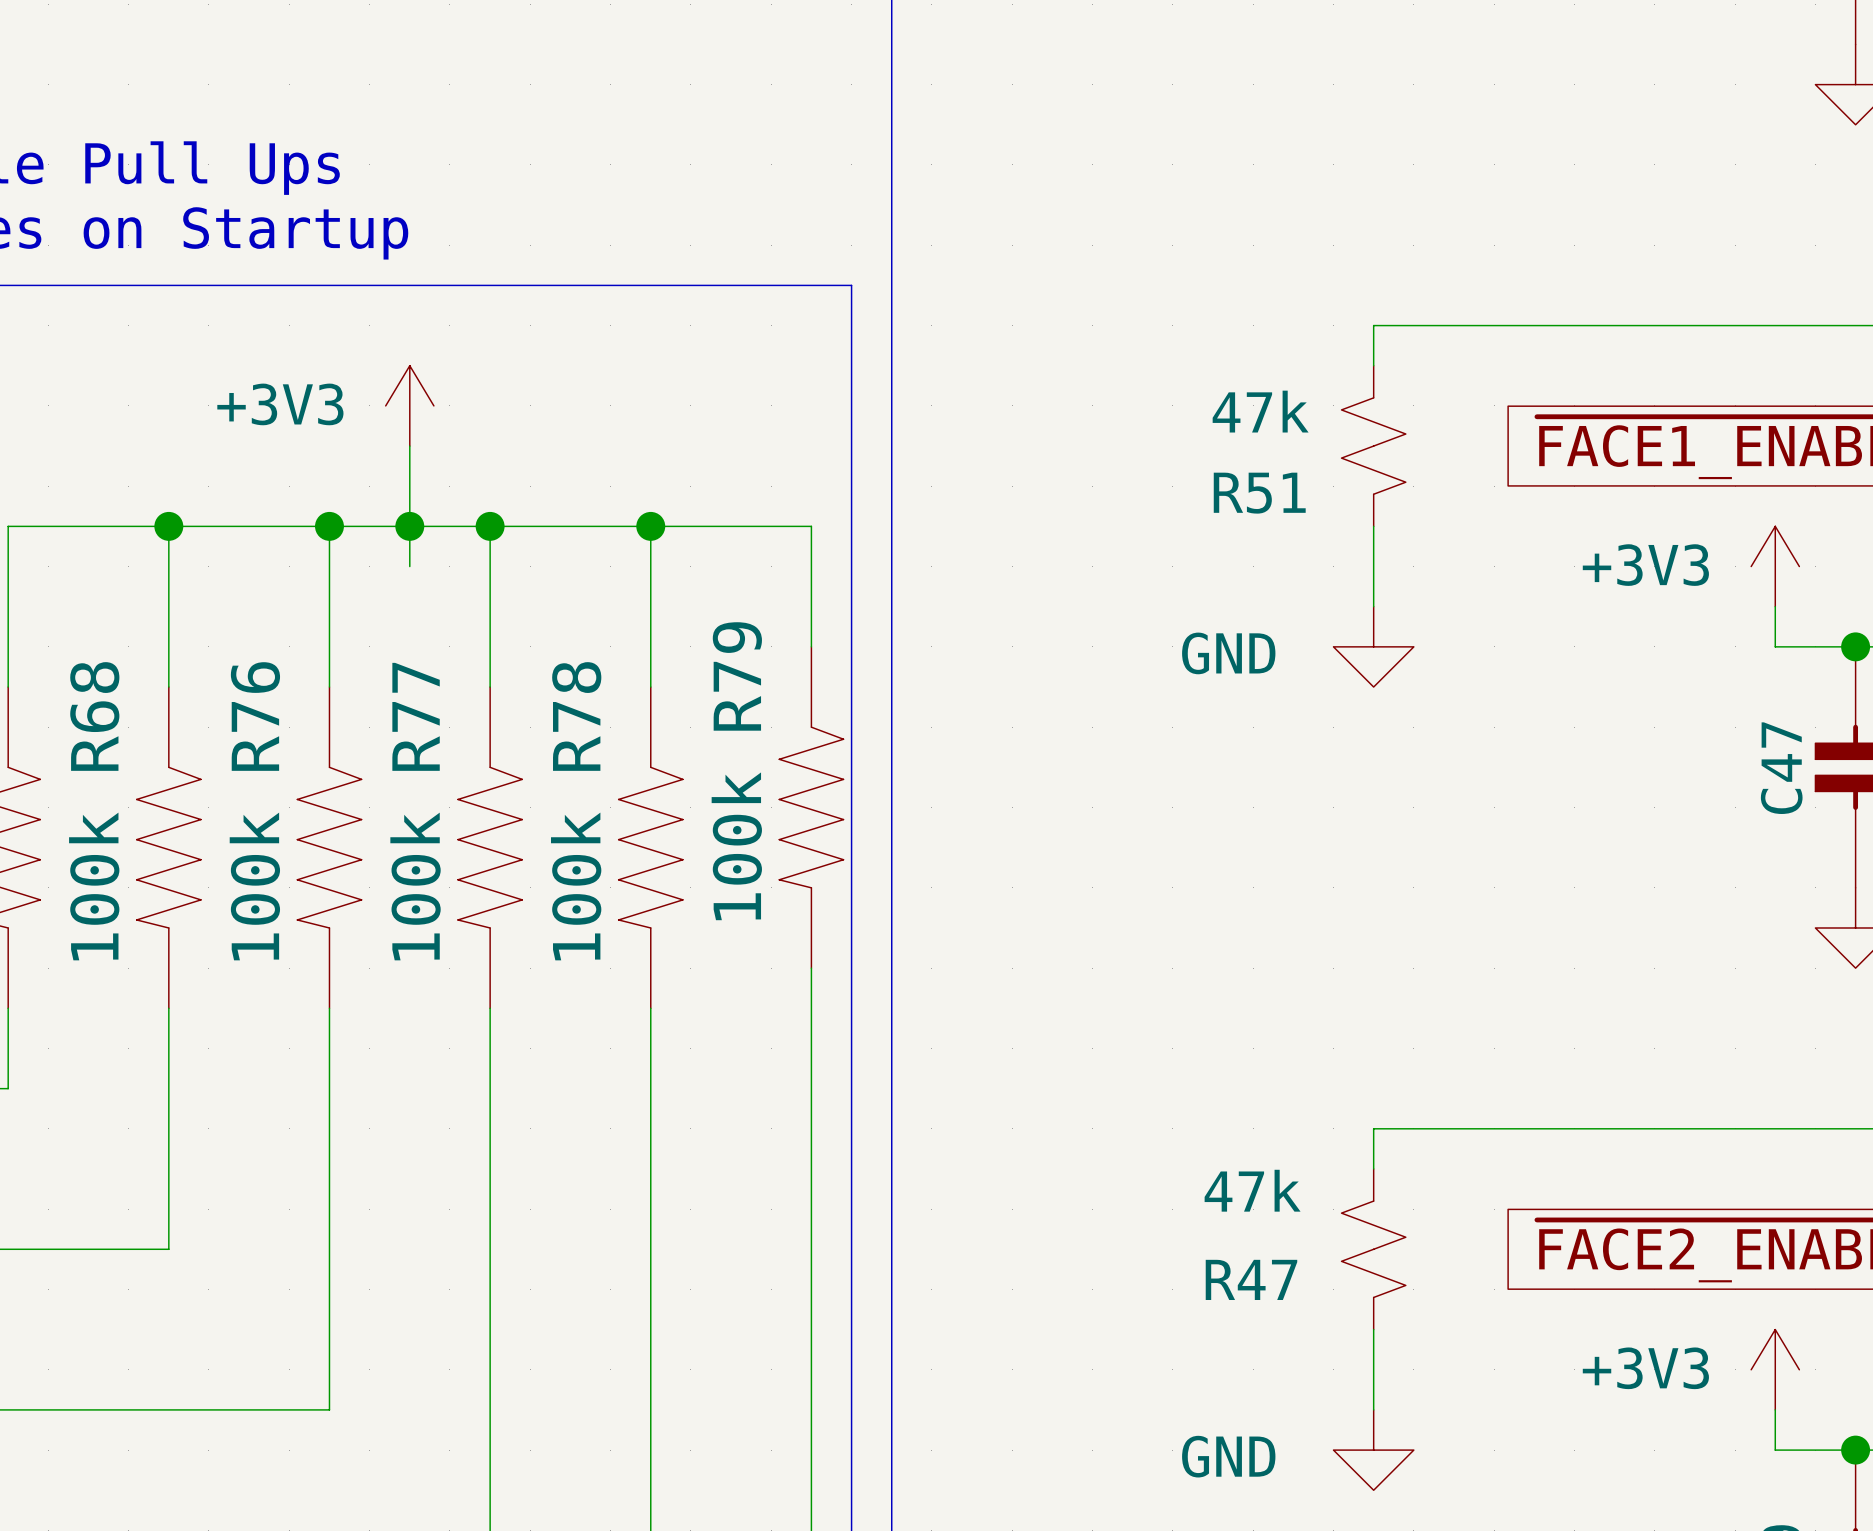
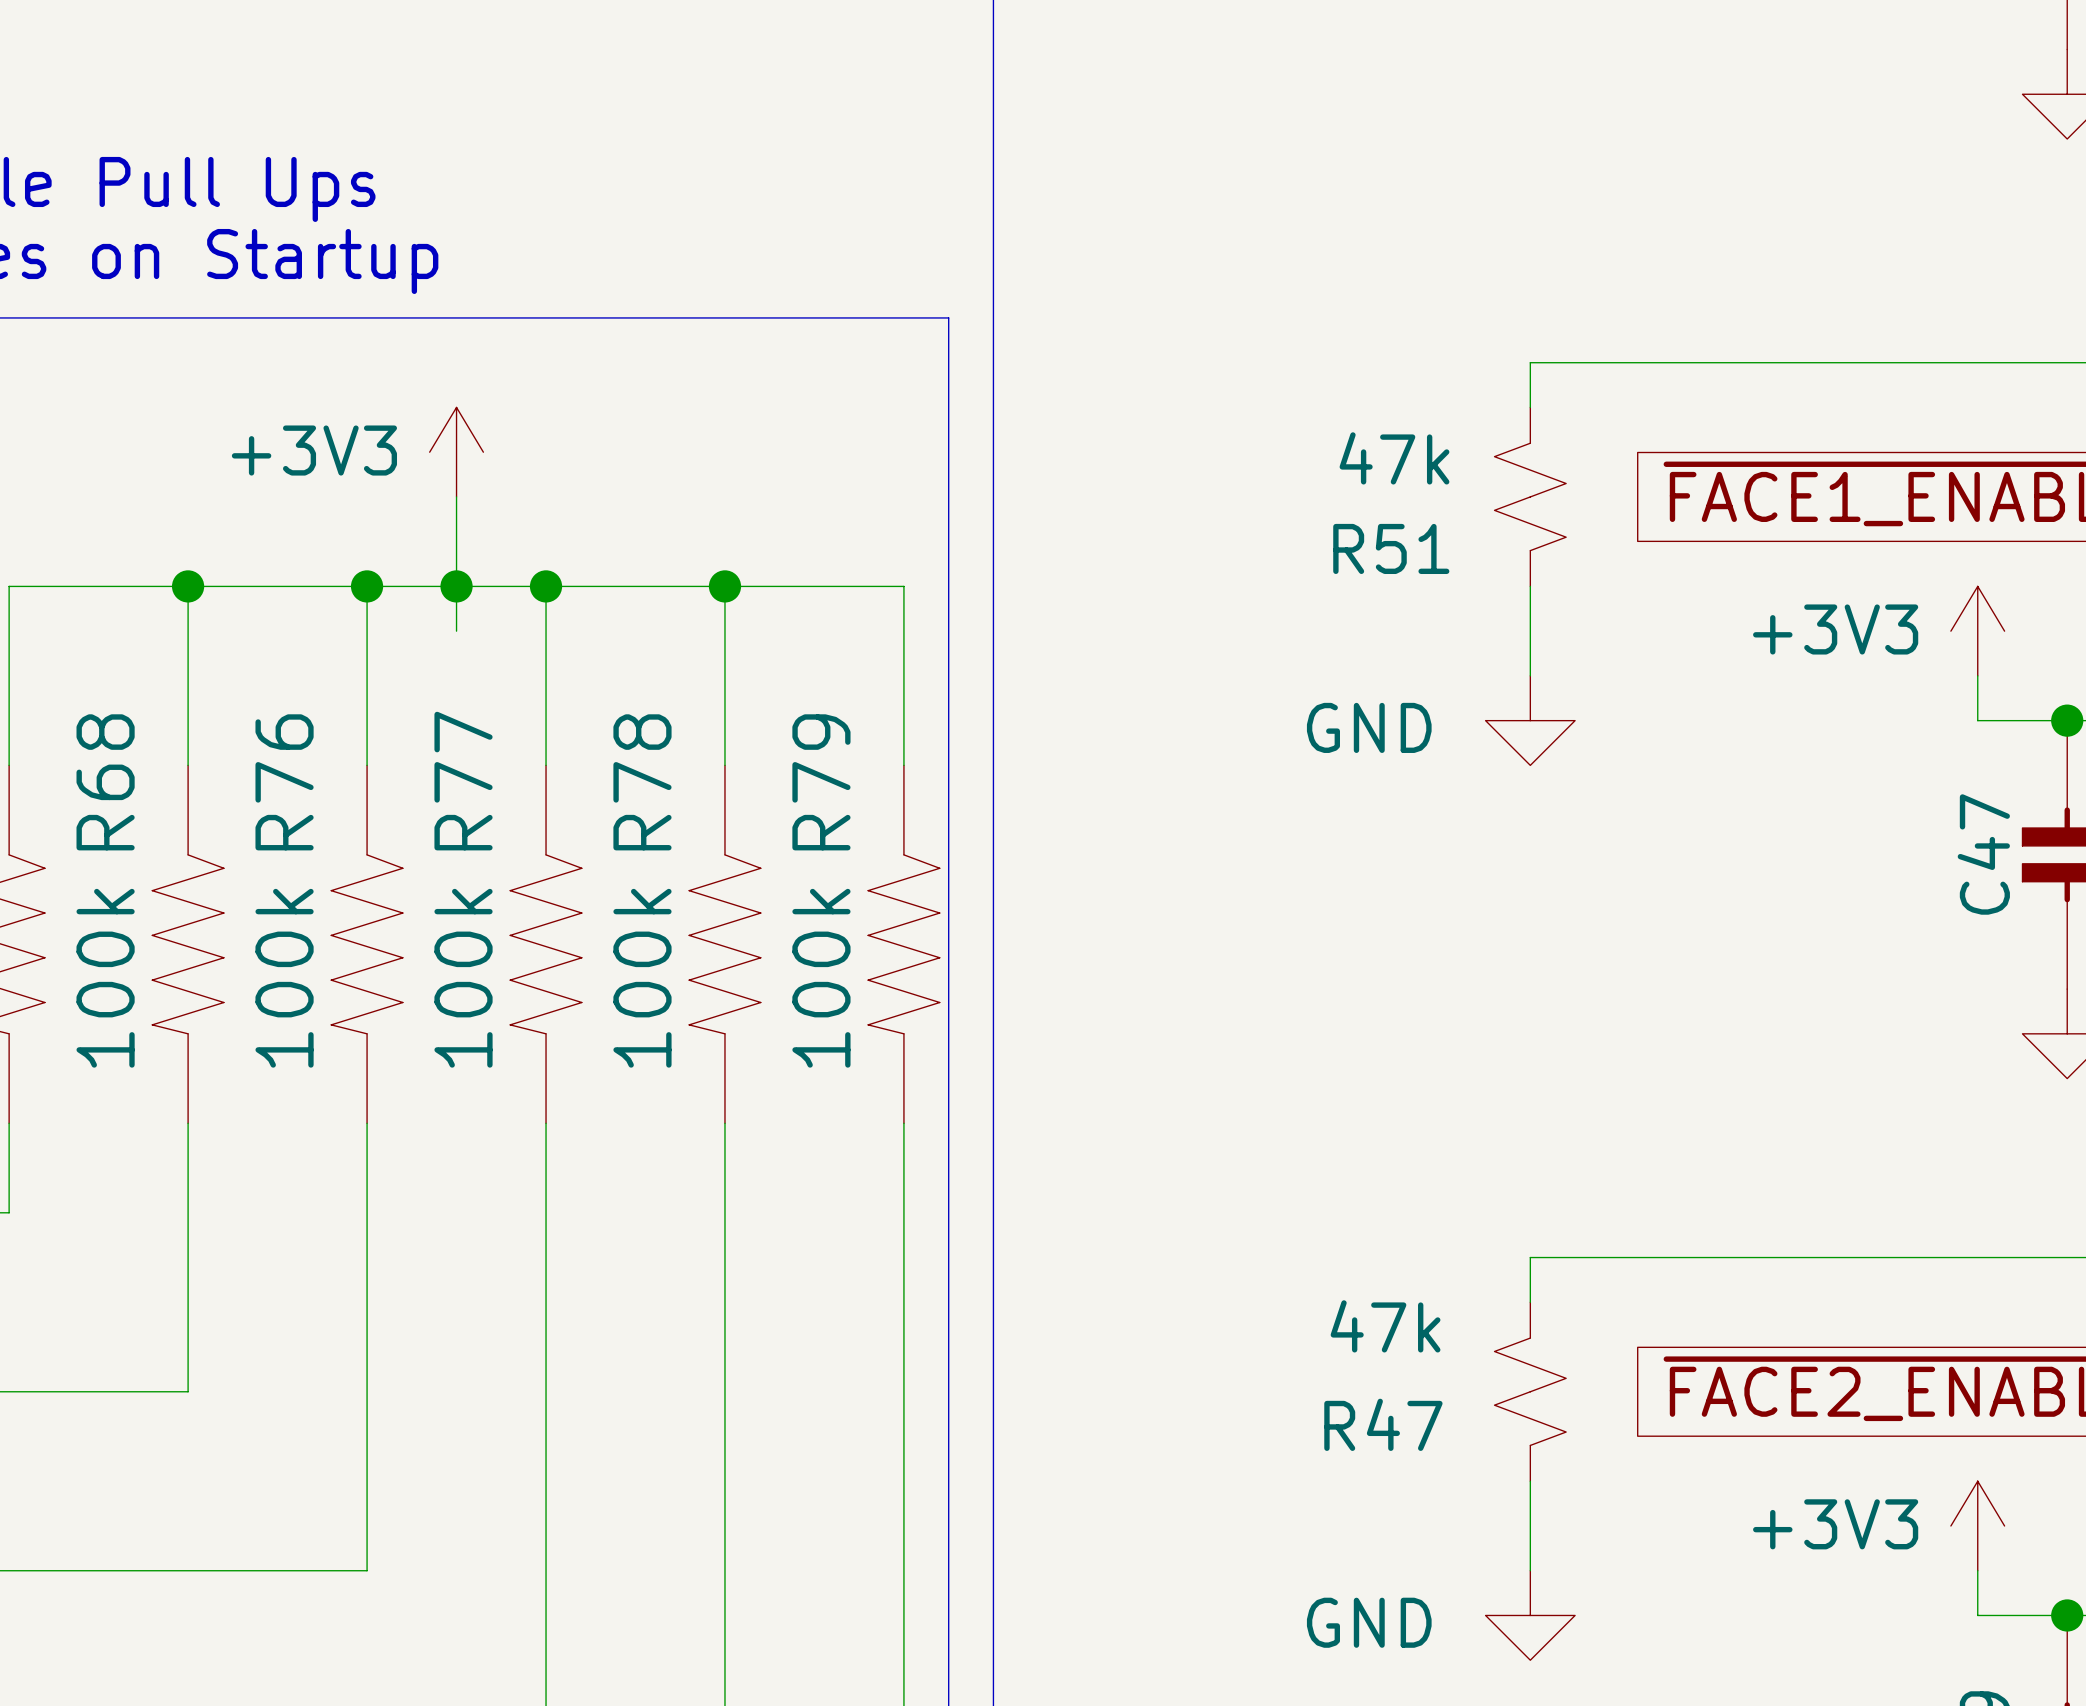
R79 position: (811, 807) -> (903, 944)

